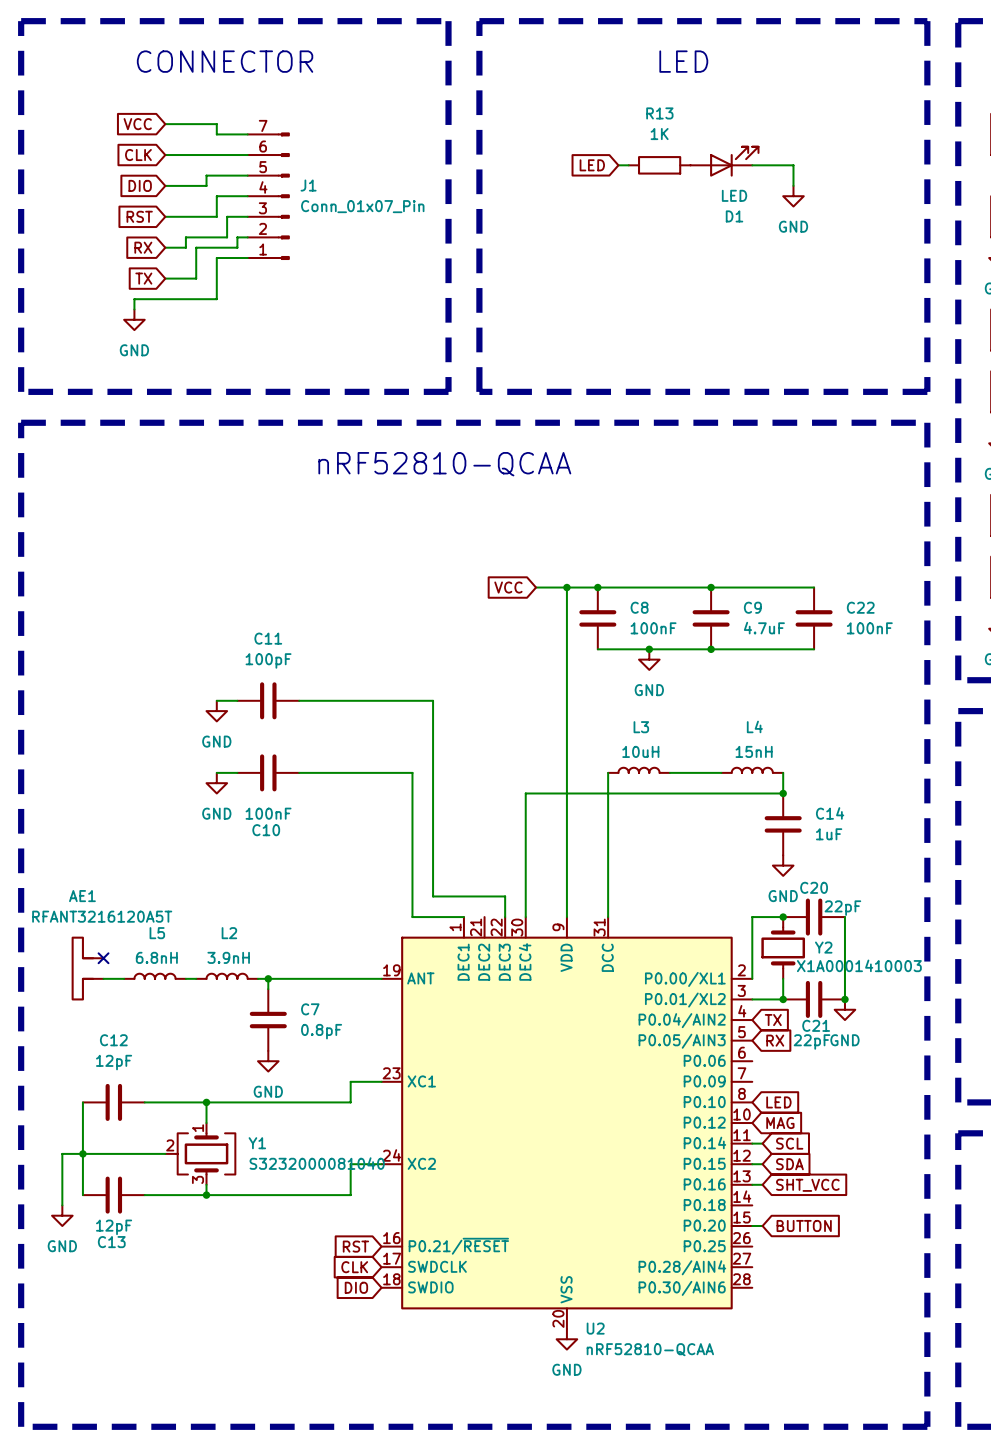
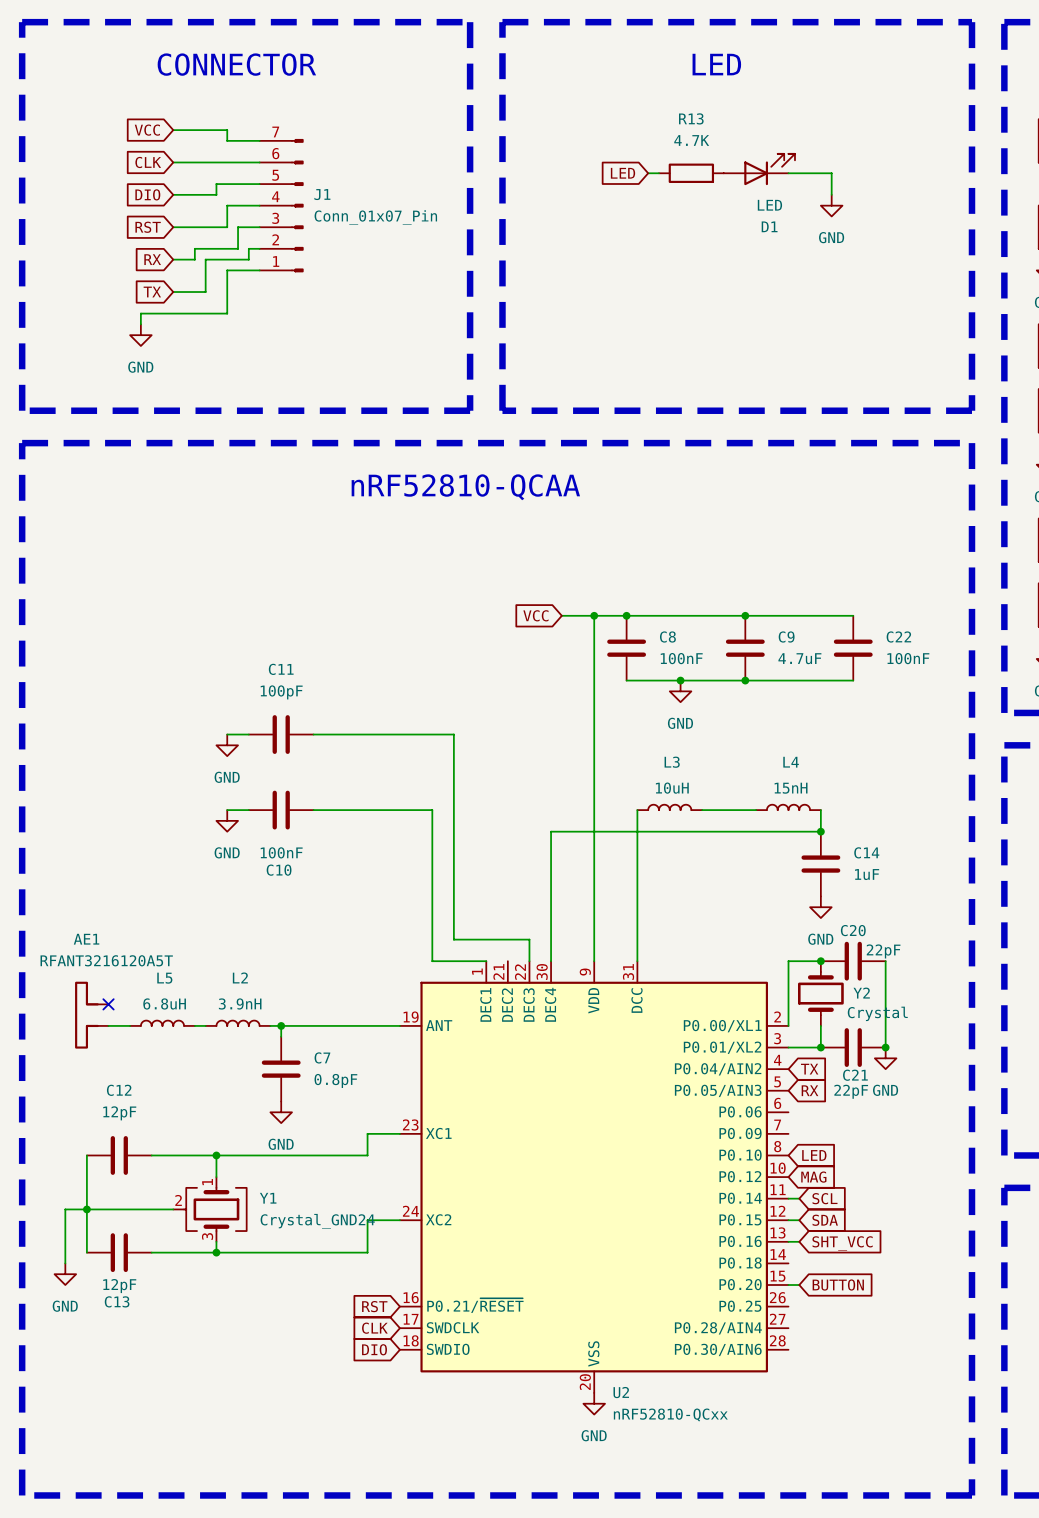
R13 value: 1K (659, 134) -> 4.7K (691, 140)
L5 value: 6.8nH (156, 957) -> 6.8uH (164, 1003)
Y2 value: X1A0001410003 (859, 965) -> Crystal (877, 1013)
Y1 value: S3232000081040 (317, 1163) -> Crystal_GND24 (317, 1221)
U2 value: nRF52810-QCAA (650, 1349) -> nRF52810-QCxx (670, 1415)

